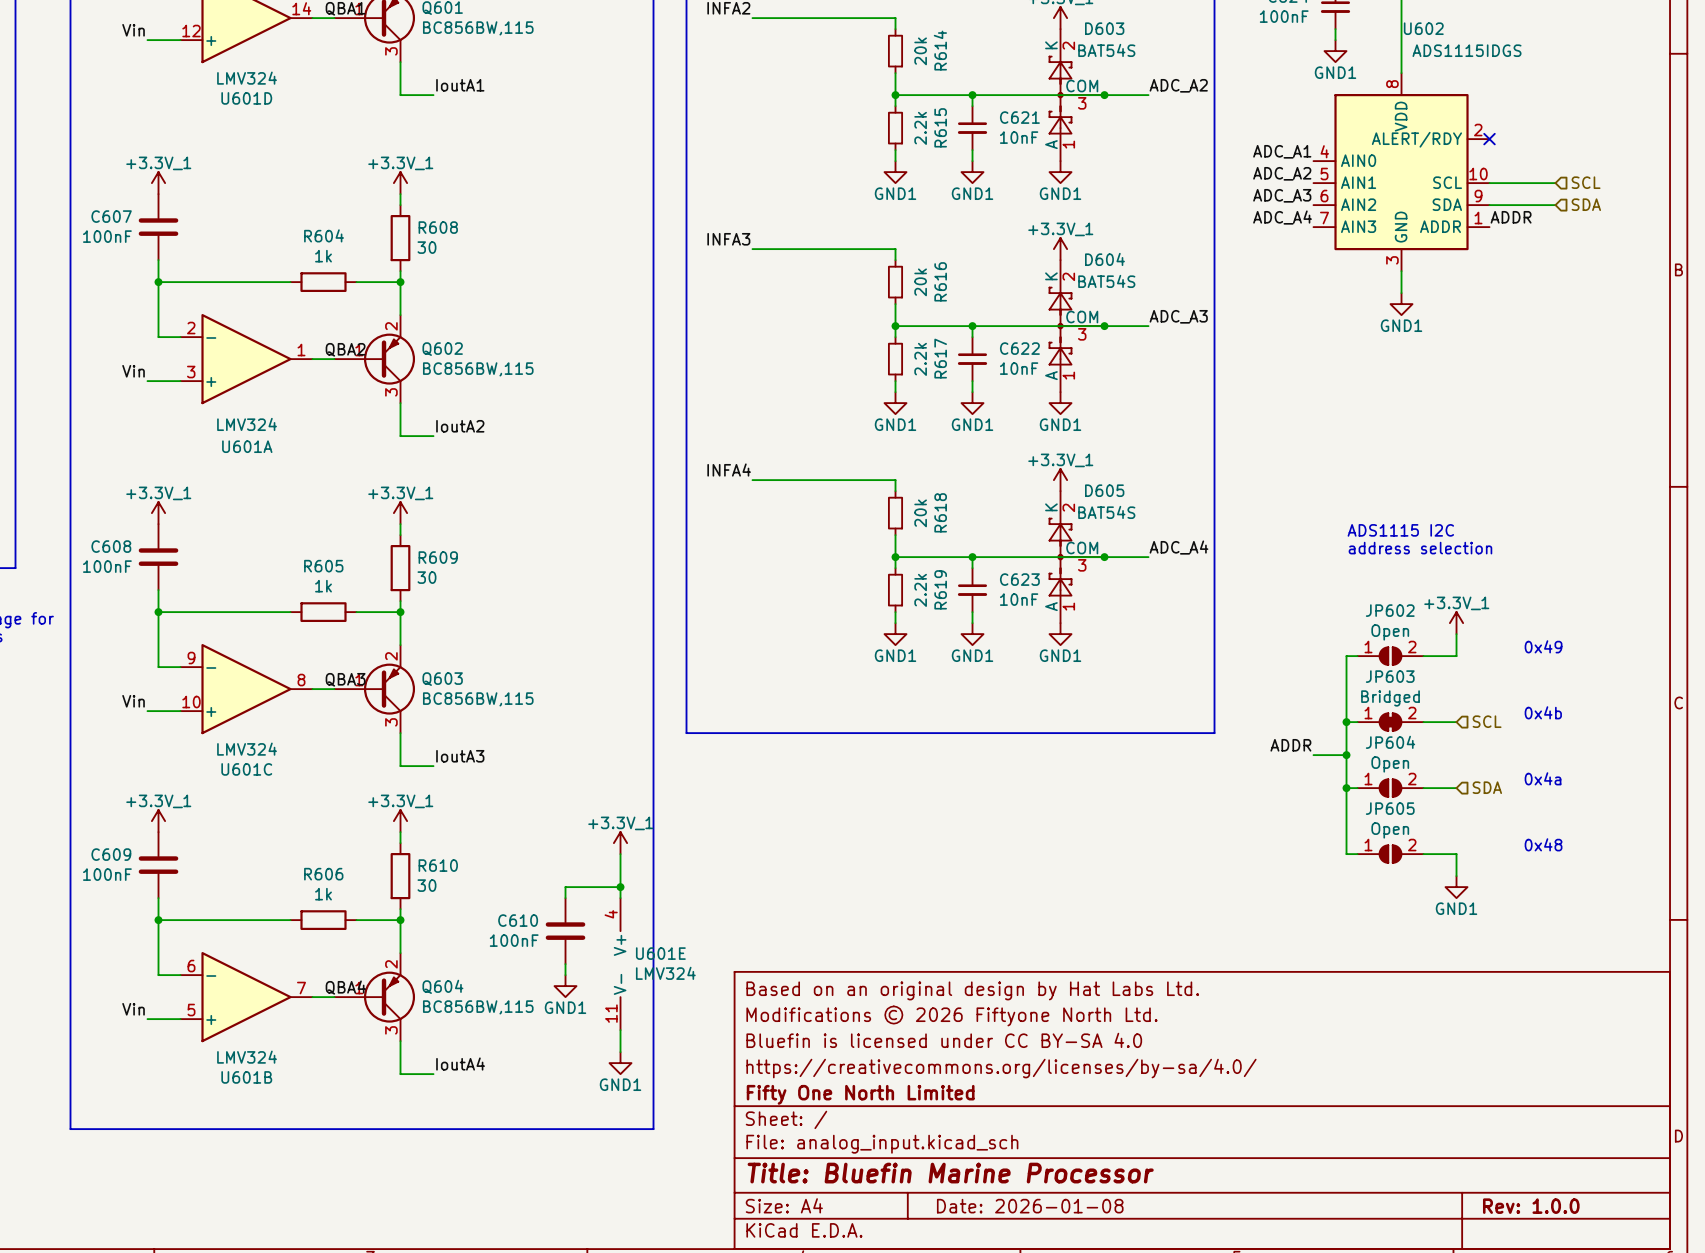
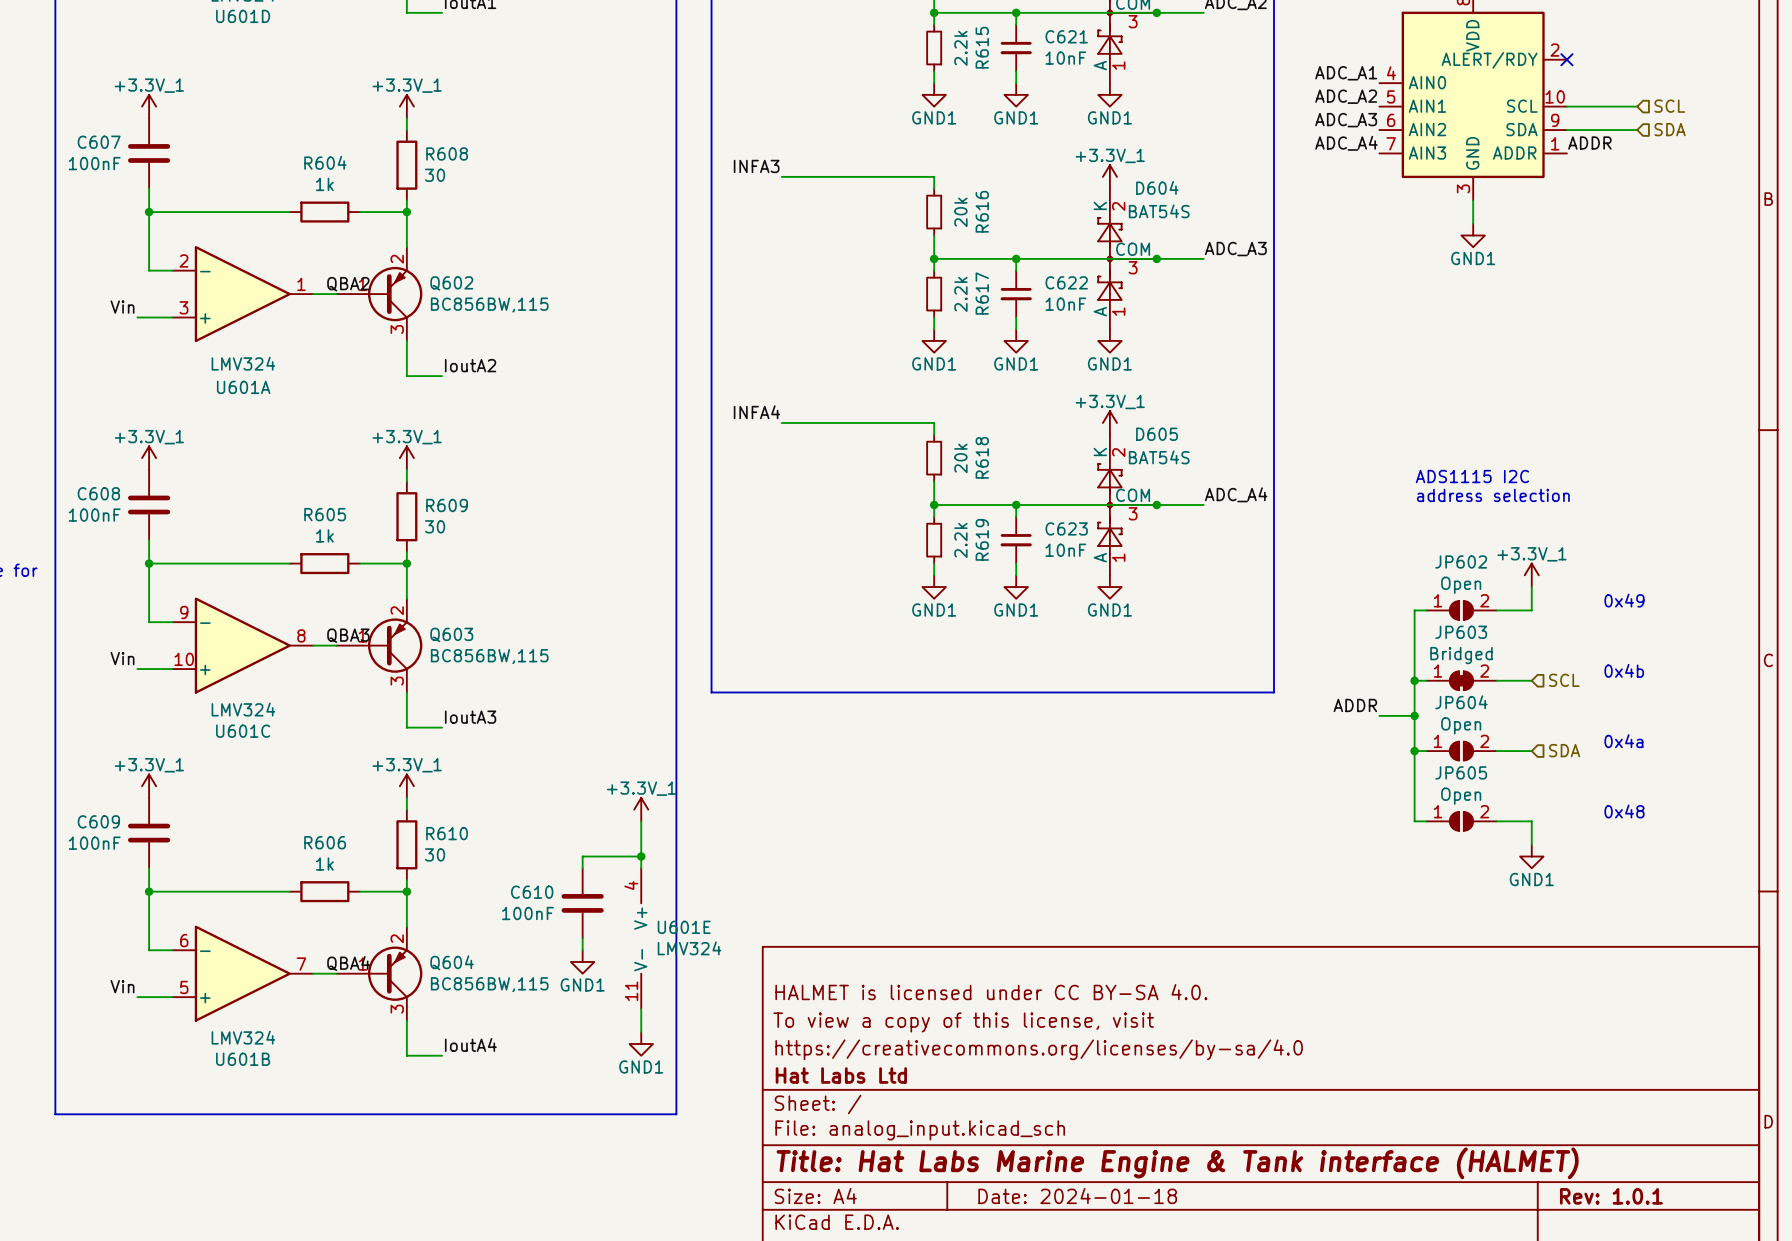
title block: Based on an original design by Hat Labs Ltd. (972, 990) -> none
title block: Modifications © 2026 Fiftyone North Ltd. (951, 1015) -> HALMET is licensed under CC BY-SA 4.0. (991, 992)
title block: Bluefin is licensed under CC BY-SA 4.0 (944, 1040) -> To view a copy of this license, visit (963, 1022)
title block: https://creativecommons.org/licenses/by-sa/4.0/ (1001, 1068) -> https://creativecommons.org/licenses/by-sa/4.0 (1039, 1049)
title block: Fifty One North Limited (860, 1094) -> Hat Labs Ltd (841, 1075)
title block: Title: Bluefin Marine Processor (950, 1173) -> Title: Hat Labs Marine Engine & Tank interface (HALMET) (1177, 1163)
title block: Date: 2026-01-08 (1030, 1206) -> Date: 2024-01-18 (1077, 1196)
title block: Rev: 1.0.0 (1531, 1206) -> Rev: 1.0.1 (1611, 1196)

